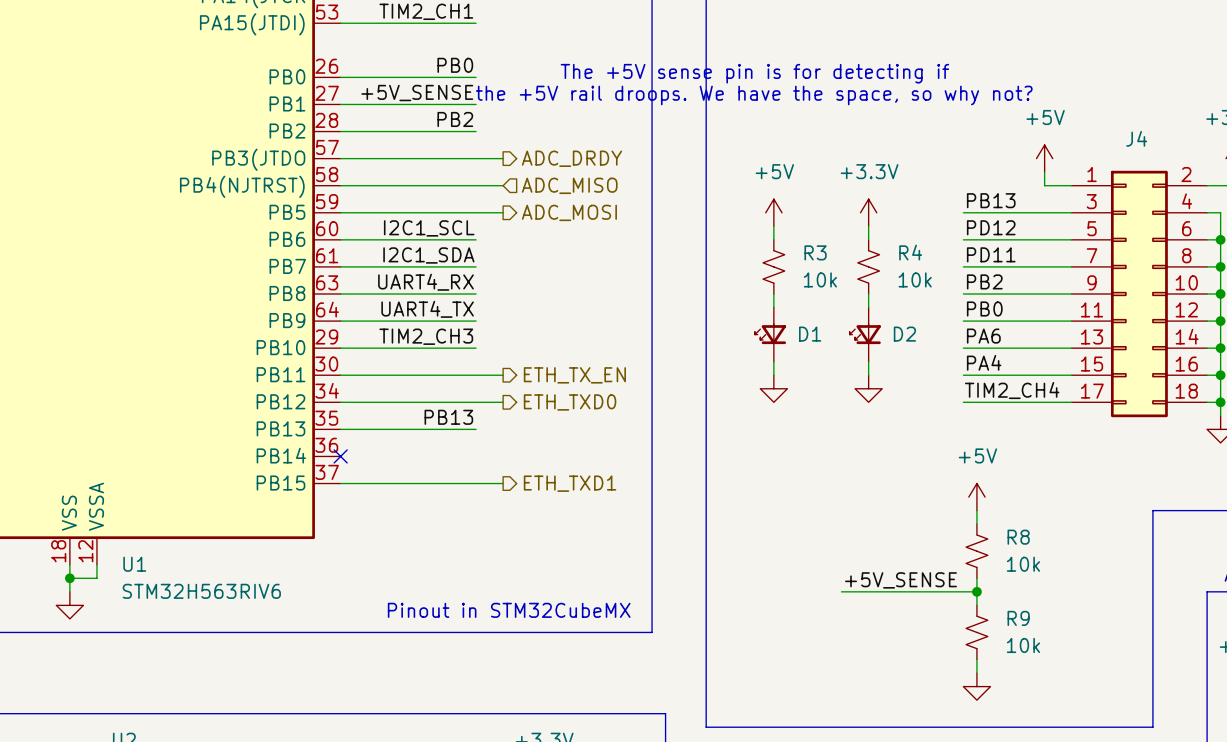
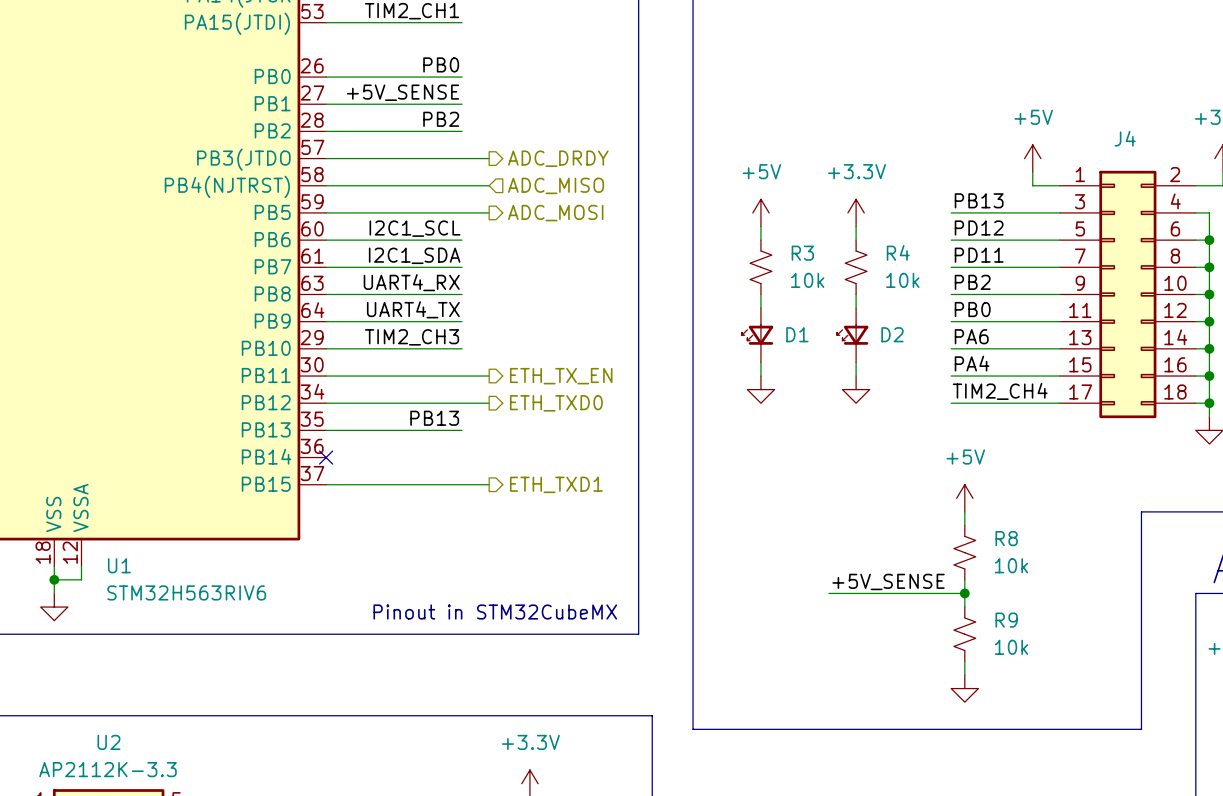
text: The +5V sense pin is for detecting if (754, 73) -> none
text: the +5V rail droops. We have the space, so why not? (754, 95) -> none

